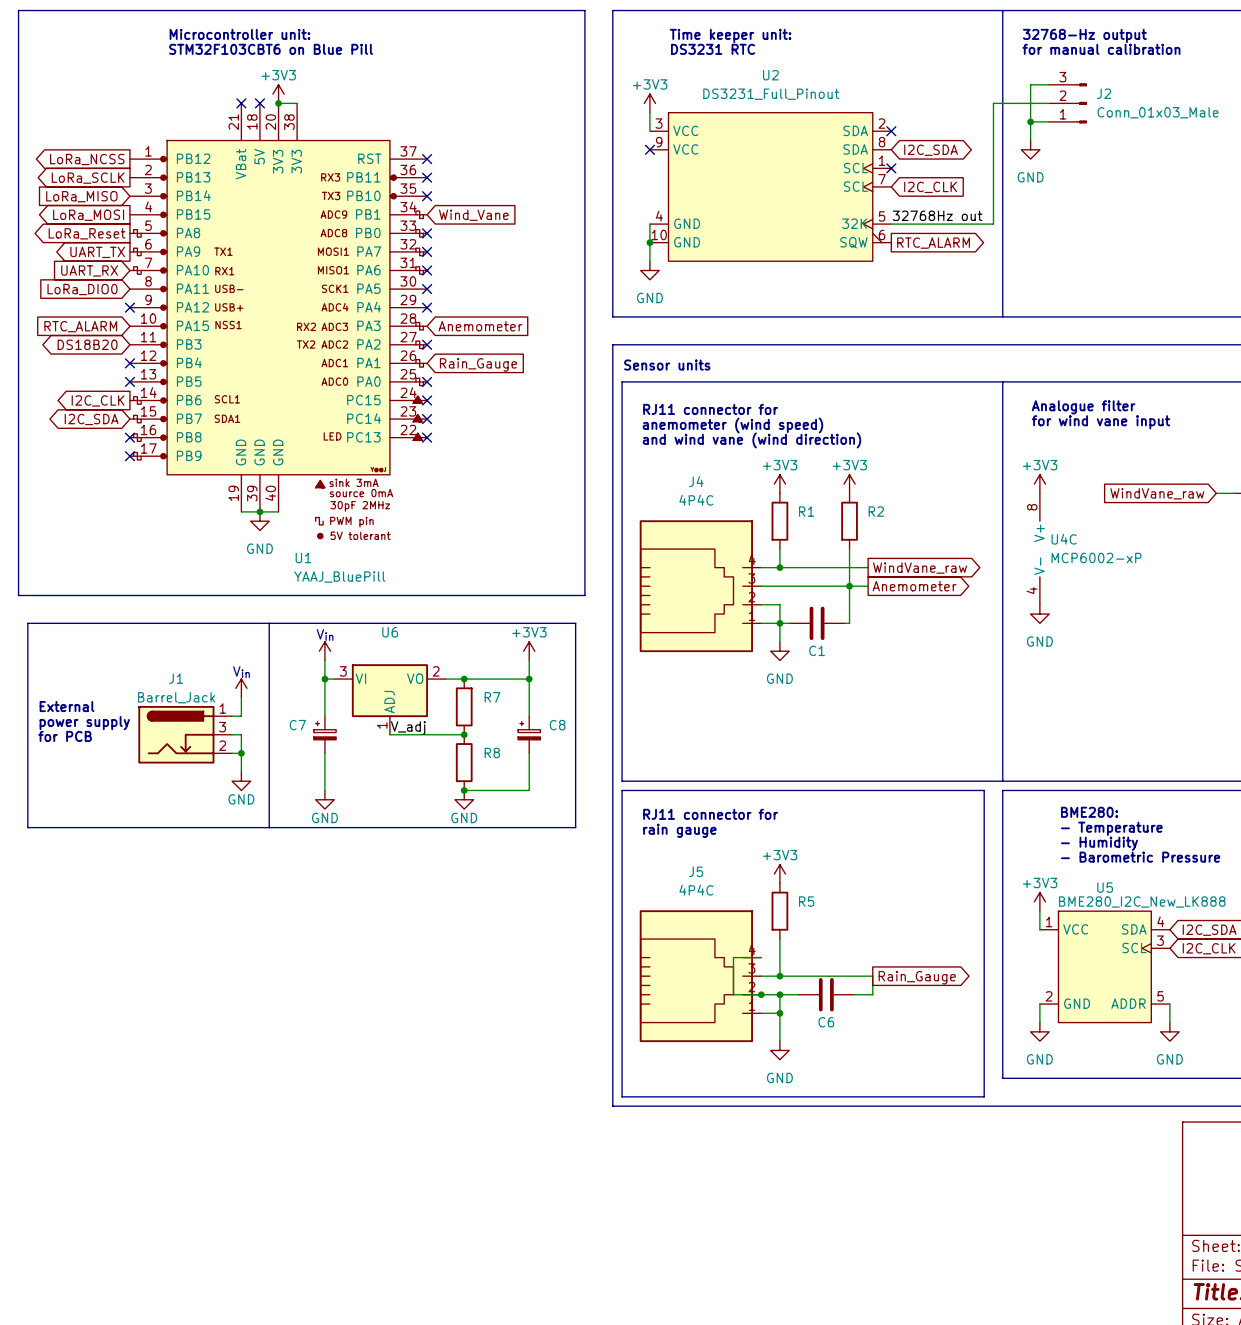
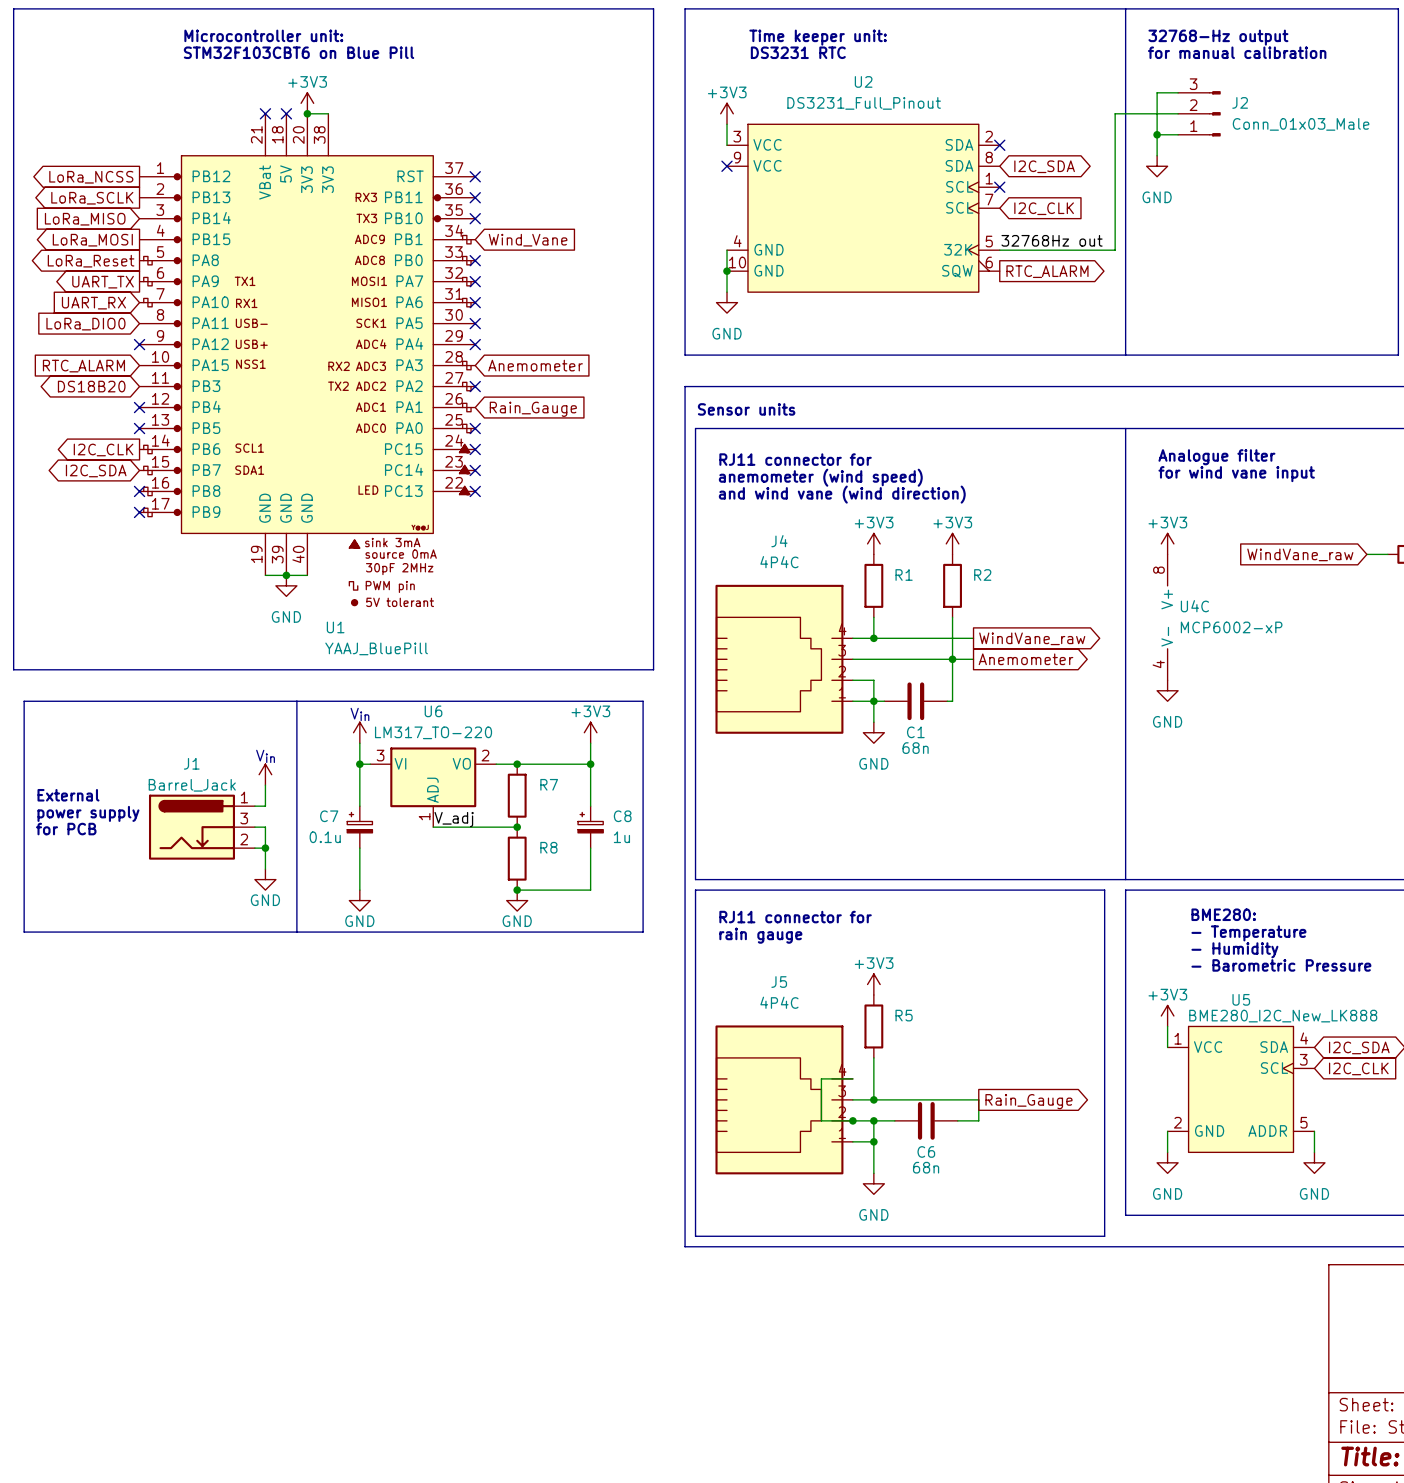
U6 value: none -> LM317_TO-220 (433, 732)
C1 value: none -> 68n (915, 748)
C7 value: none -> 0.1u (325, 837)
C8 value: none -> 1u (621, 837)
C6 value: none -> 68n (926, 1167)

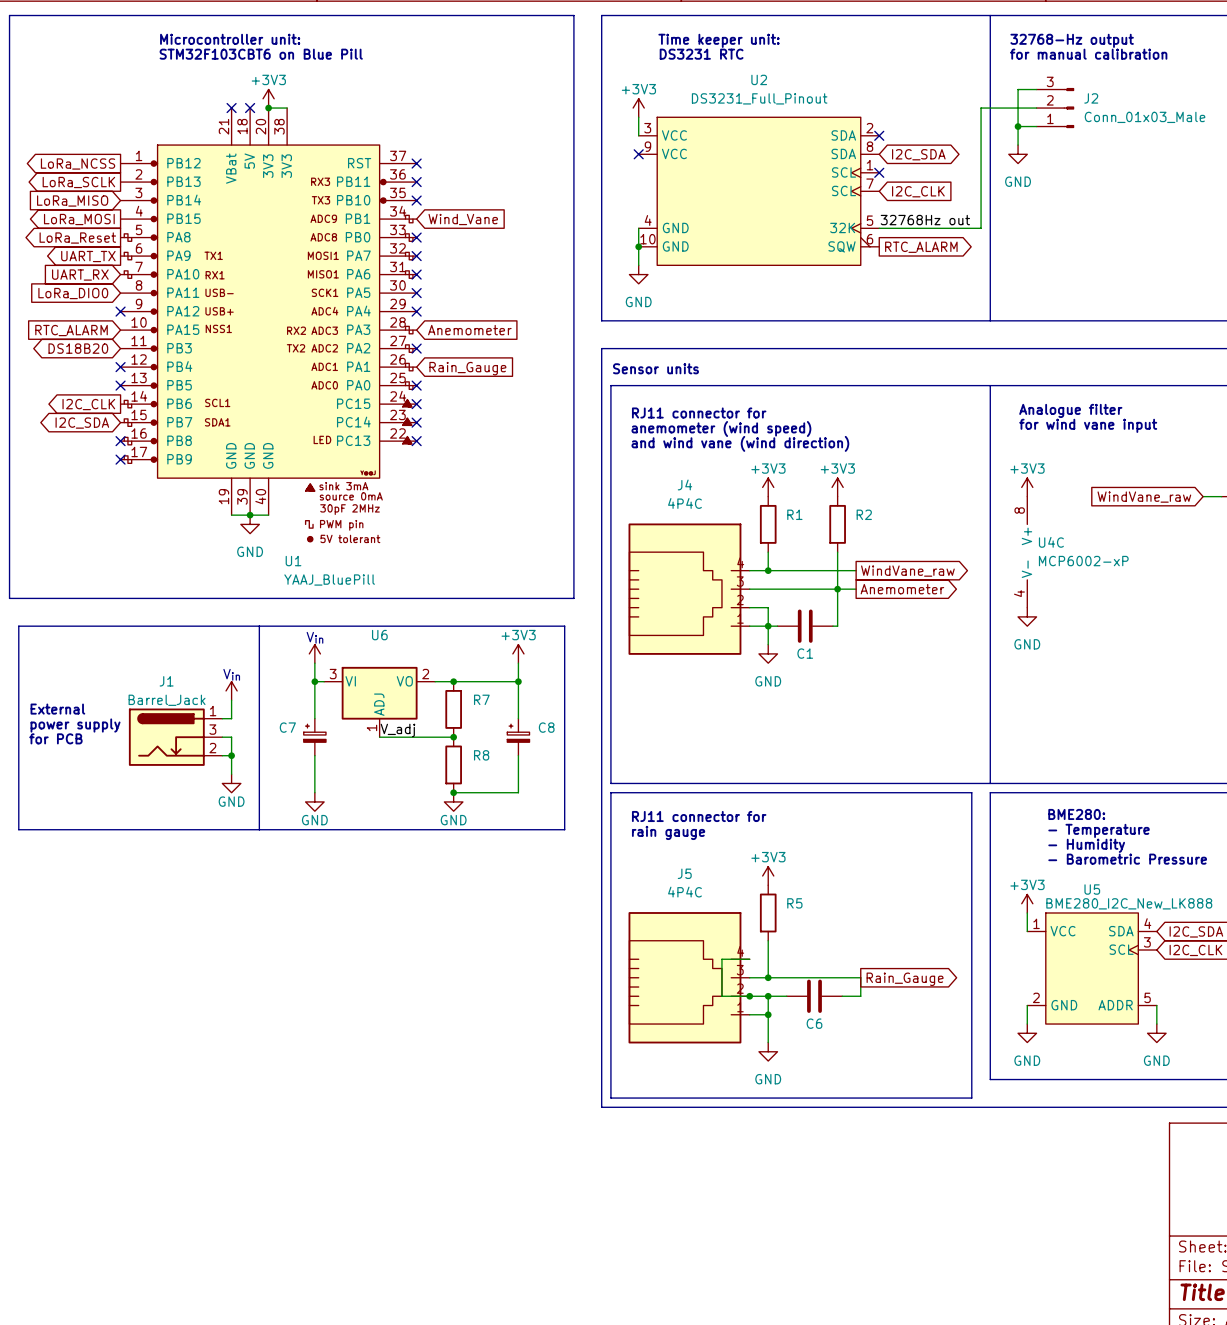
U6 value: LM317_TO-220 (433, 732) -> none
C1 value: 68n (915, 748) -> none
C7 value: 0.1u (325, 837) -> none
C8 value: 1u (621, 837) -> none
C6 value: 68n (926, 1167) -> none

